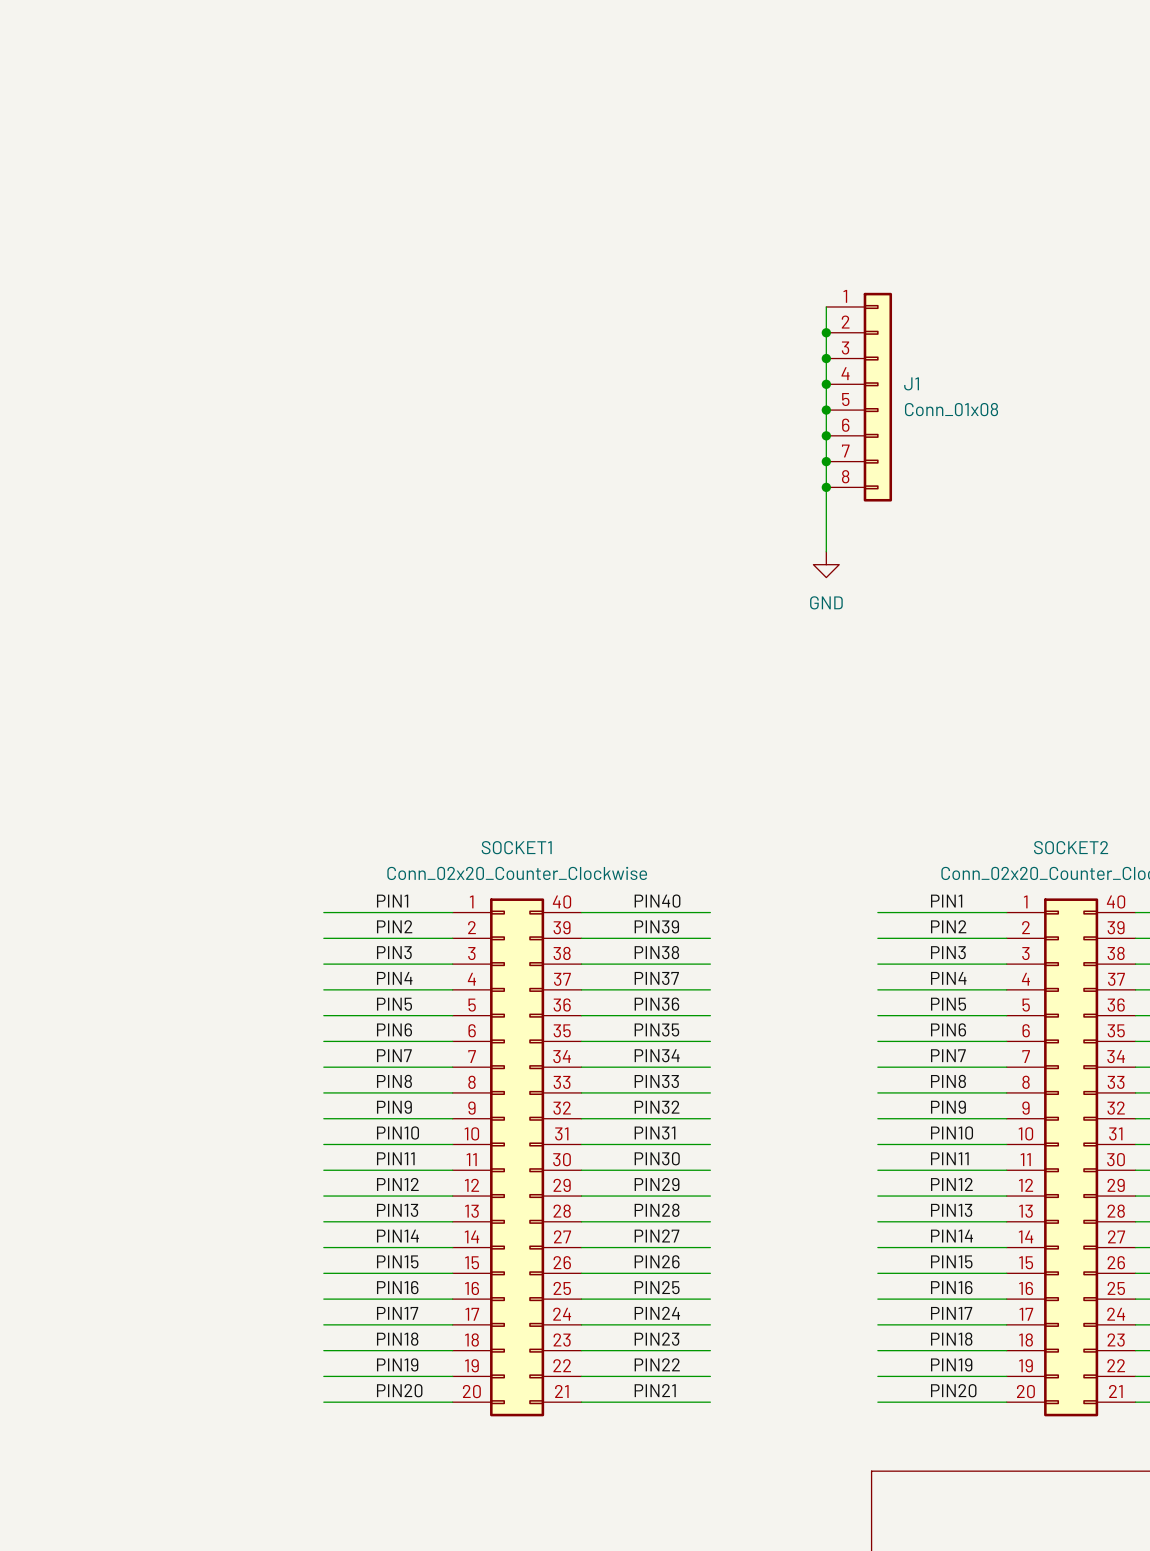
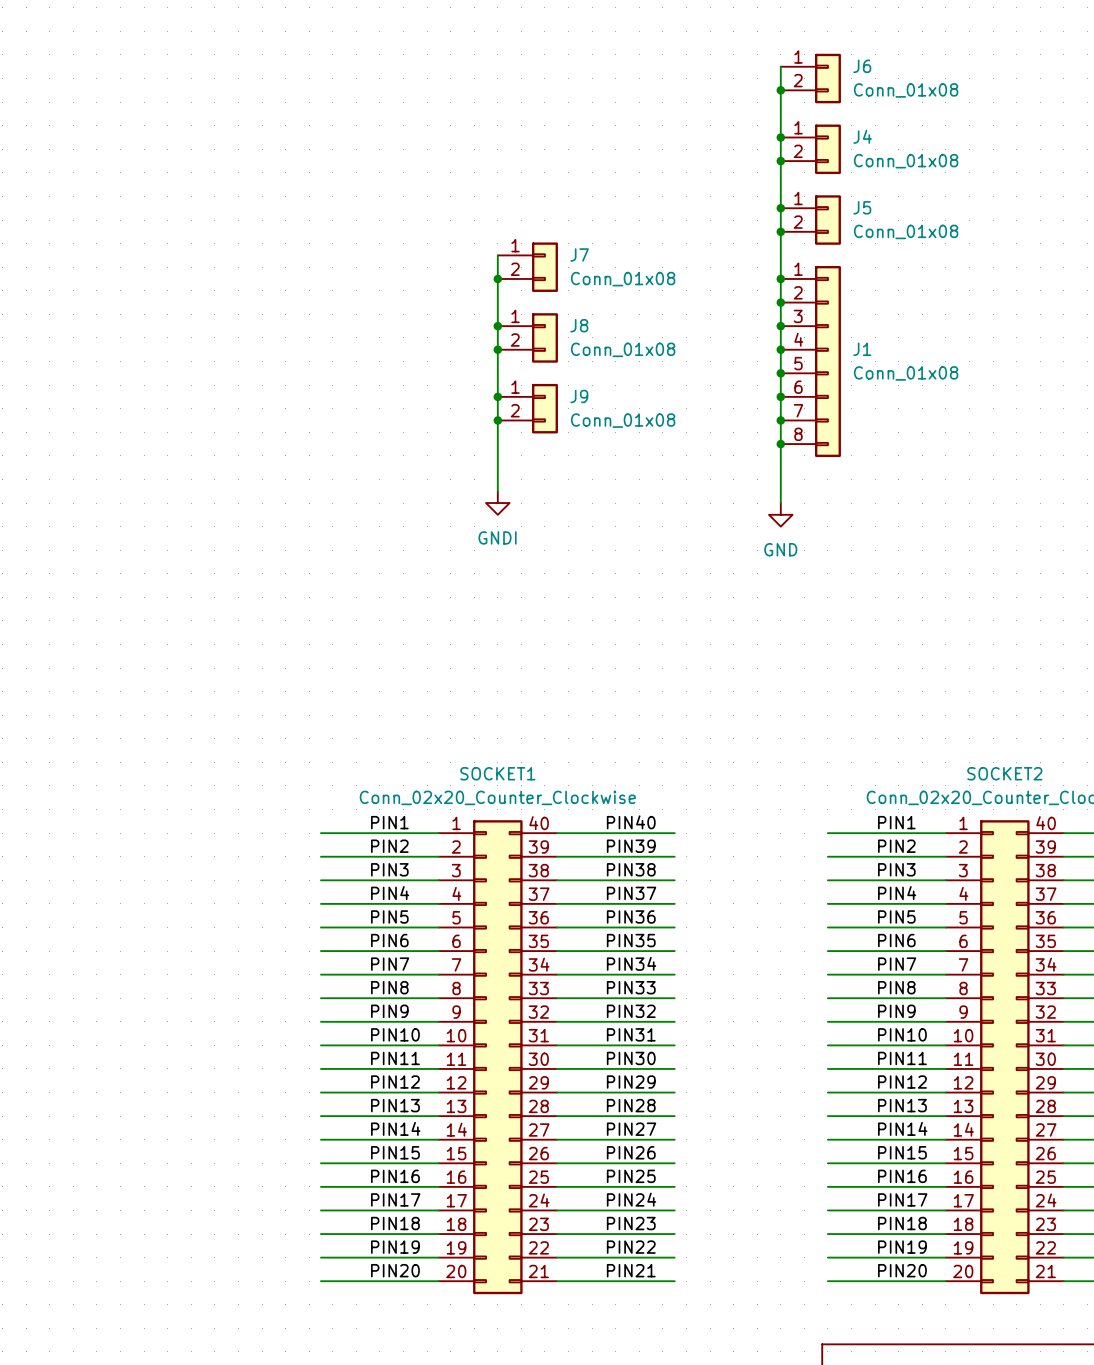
wire: none -> (780, 66) (780, 278)
J6: none -> Conn_01x08 (810, 78)
junction: none -> (780, 90)
junction: none -> (780, 137)
J4: none -> Conn_01x08 (810, 149)
junction: none -> (780, 161)
junction: none -> (780, 208)
J5: none -> Conn_01x08 (810, 220)
junction: none -> (780, 231)
wire: none -> (497, 255) (497, 491)
J7: none -> Conn_01x08 (527, 267)
junction: none -> (497, 278)
junction: none -> (780, 278)
junction: none -> (497, 326)
J8: none -> Conn_01x08 (527, 337)
junction: none -> (497, 349)
junction: none -> (497, 396)
J9: none -> Conn_01x08 (527, 408)
junction: none -> (497, 420)
power symbol: none -> GNDI (497, 503)

